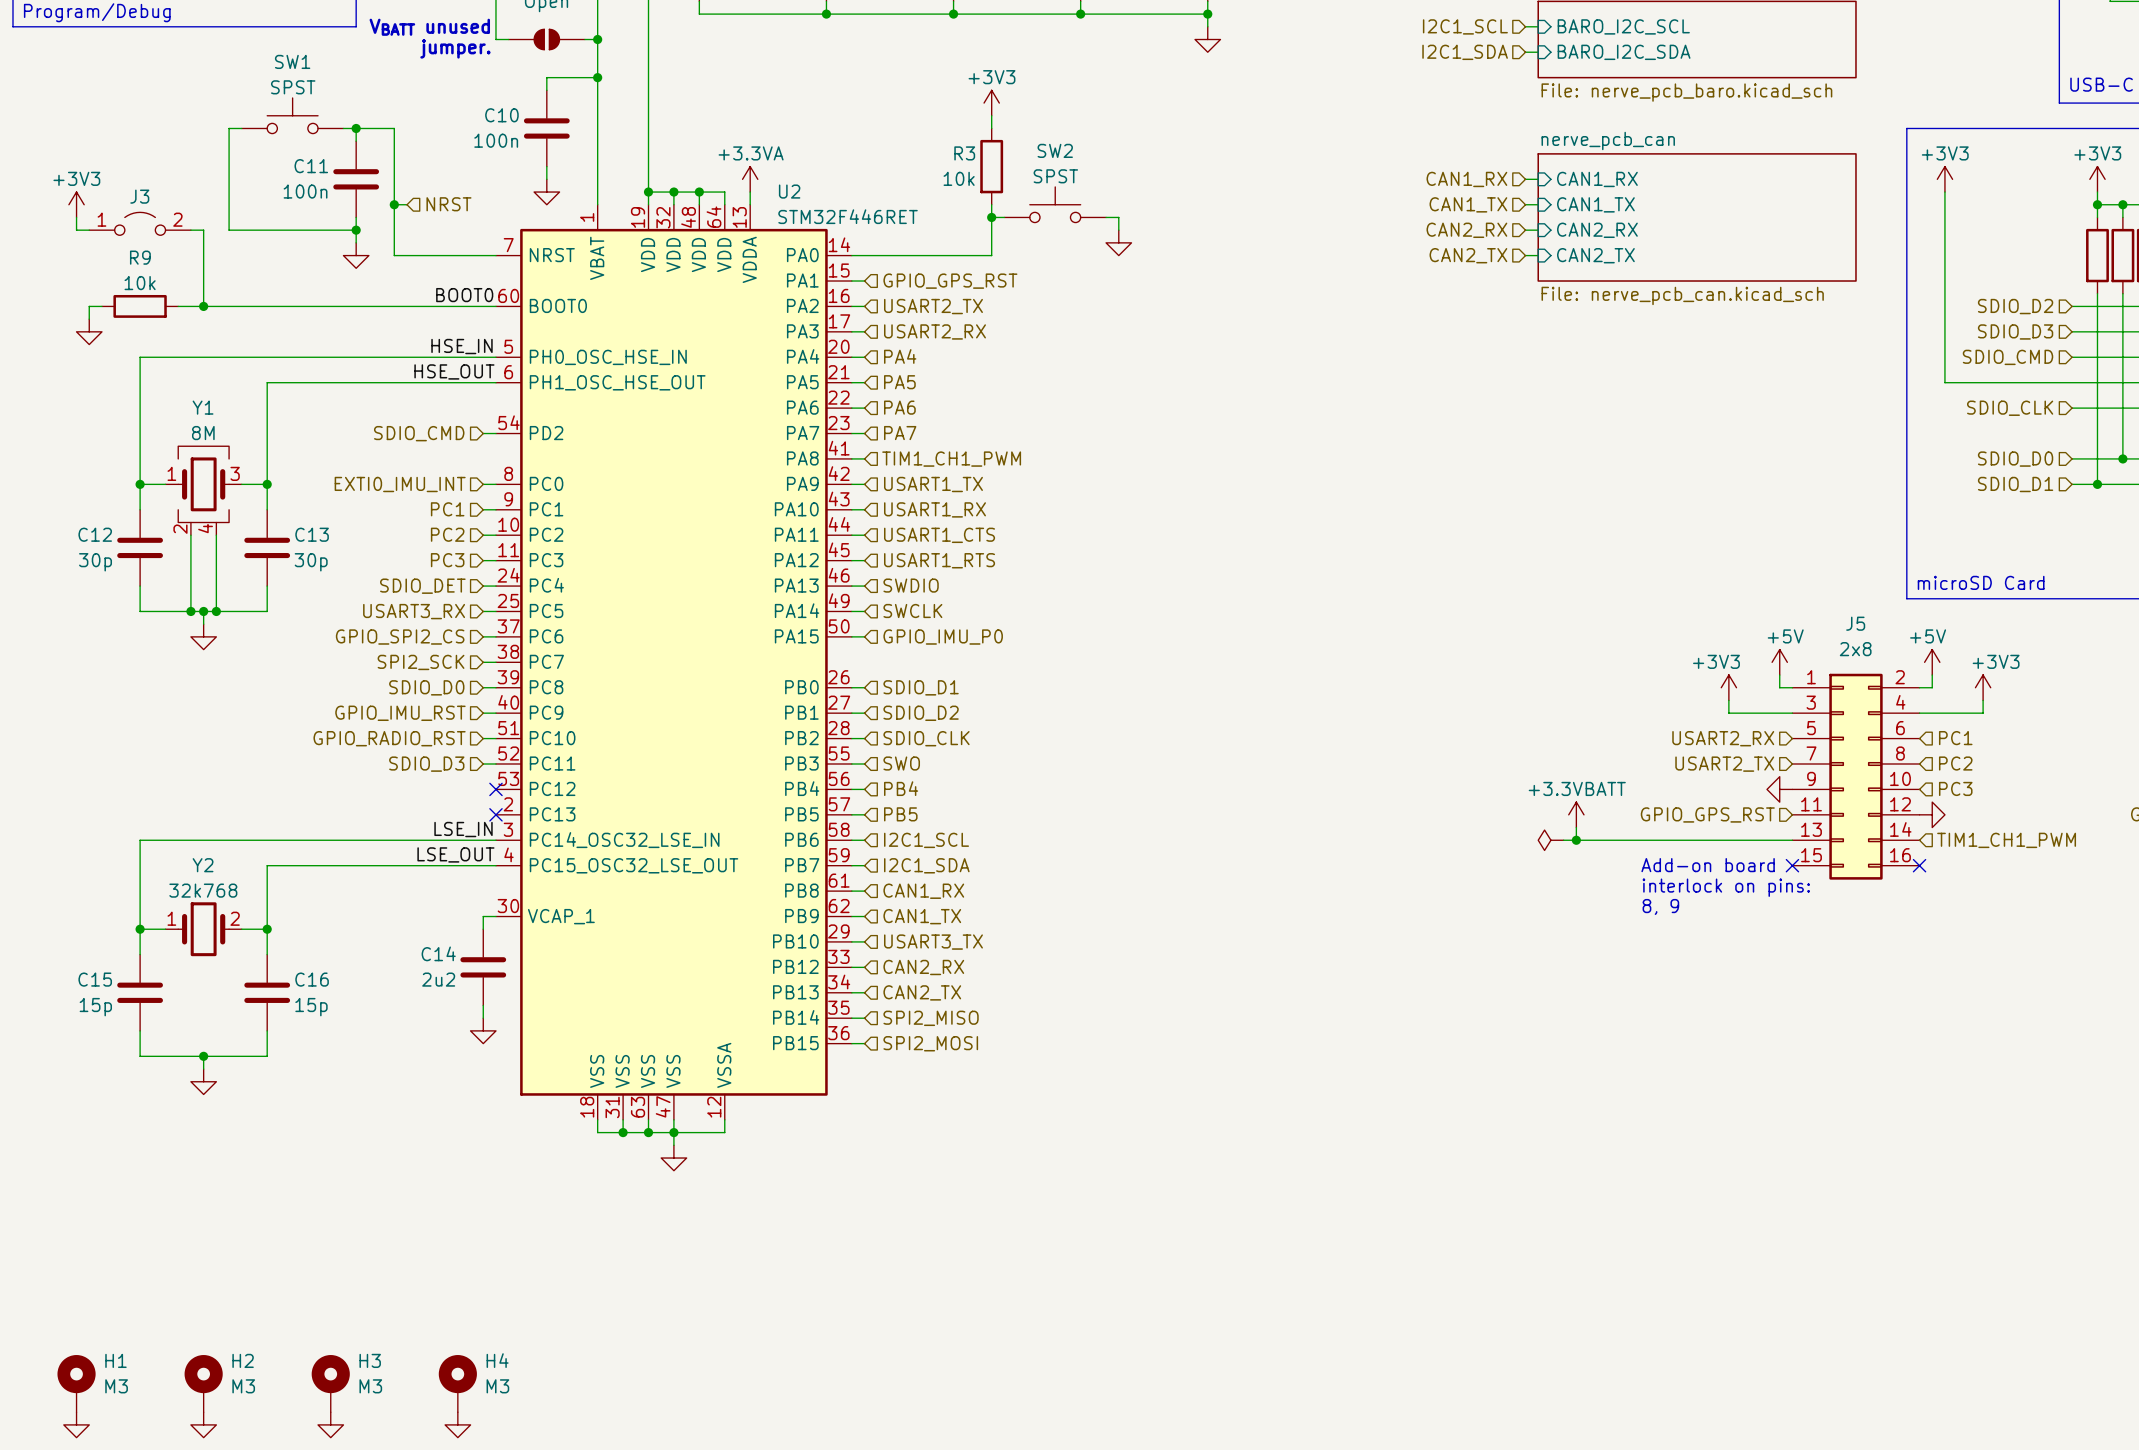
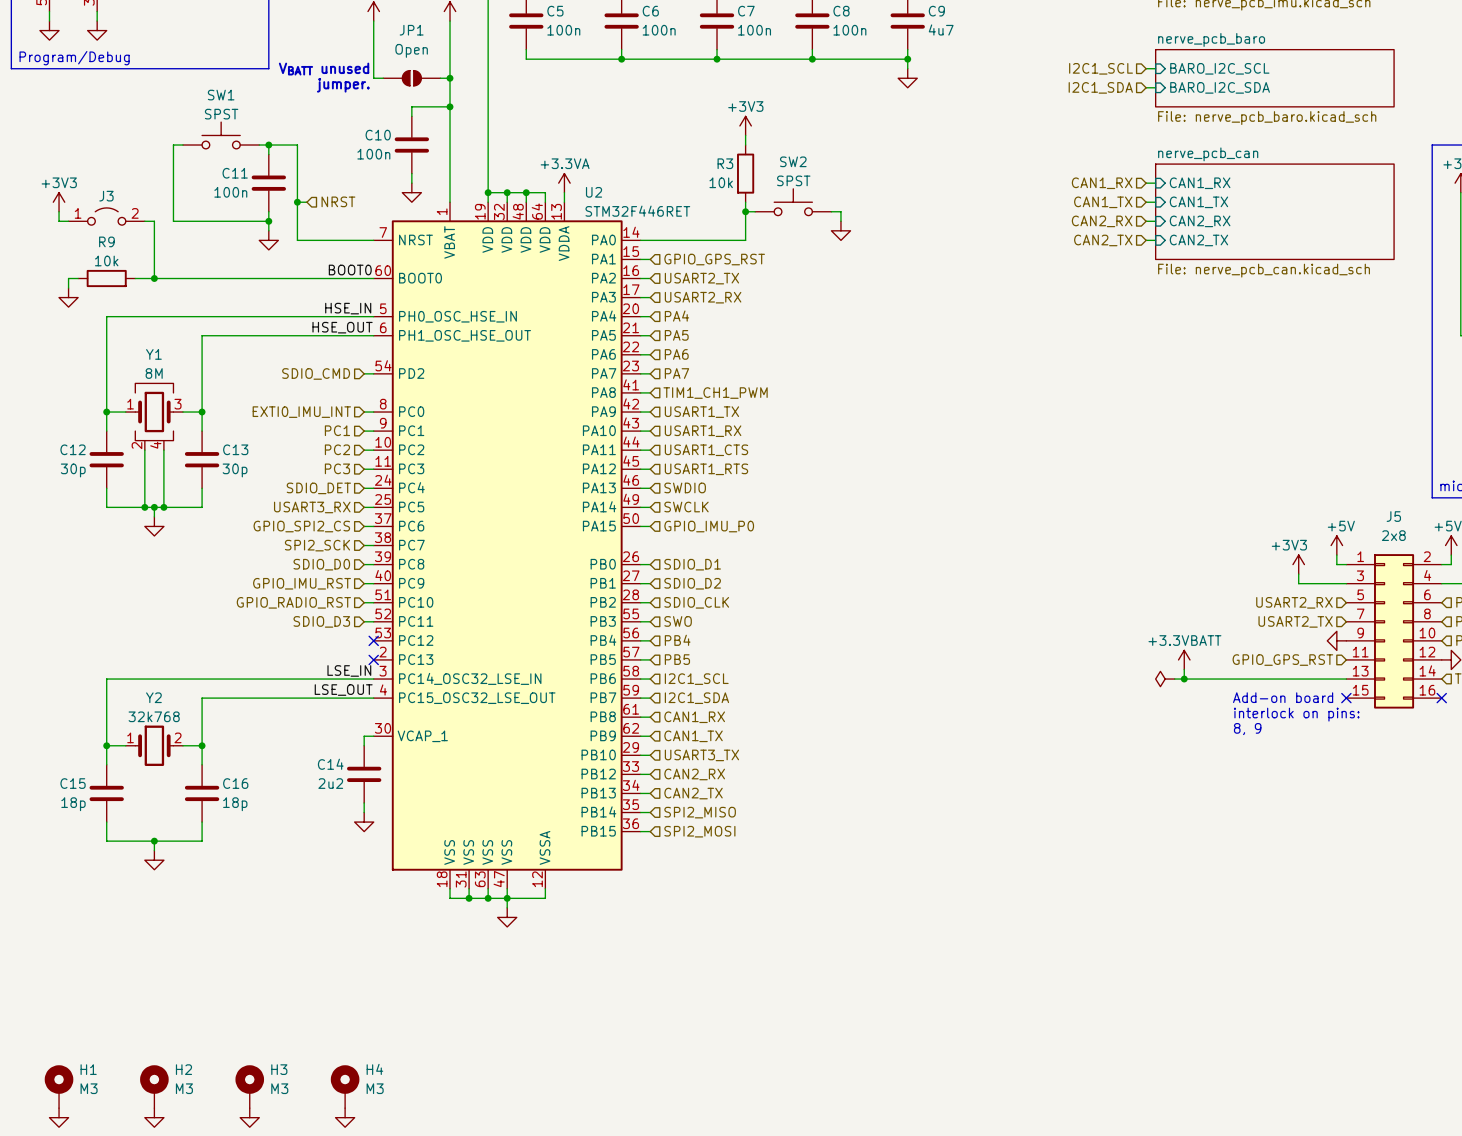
C15 value: 15p (95, 1007) -> 18p (73, 804)
C16 value: 15p (311, 1007) -> 18p (235, 804)

